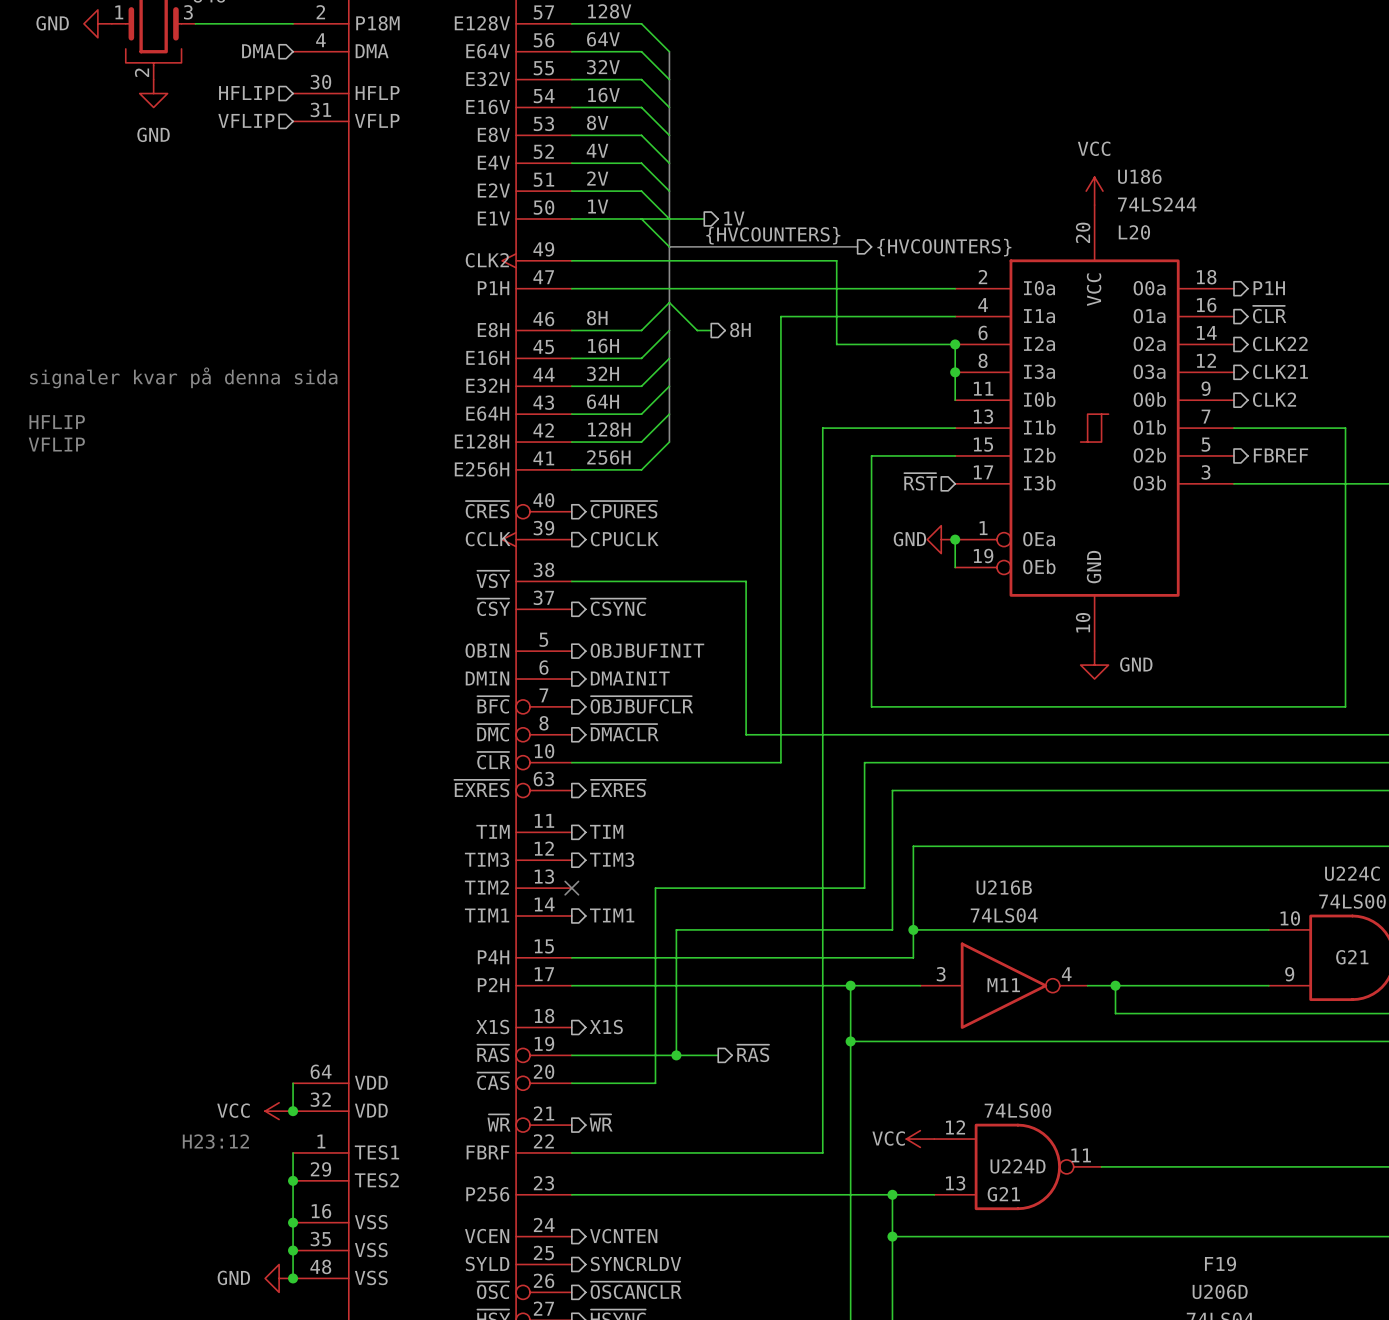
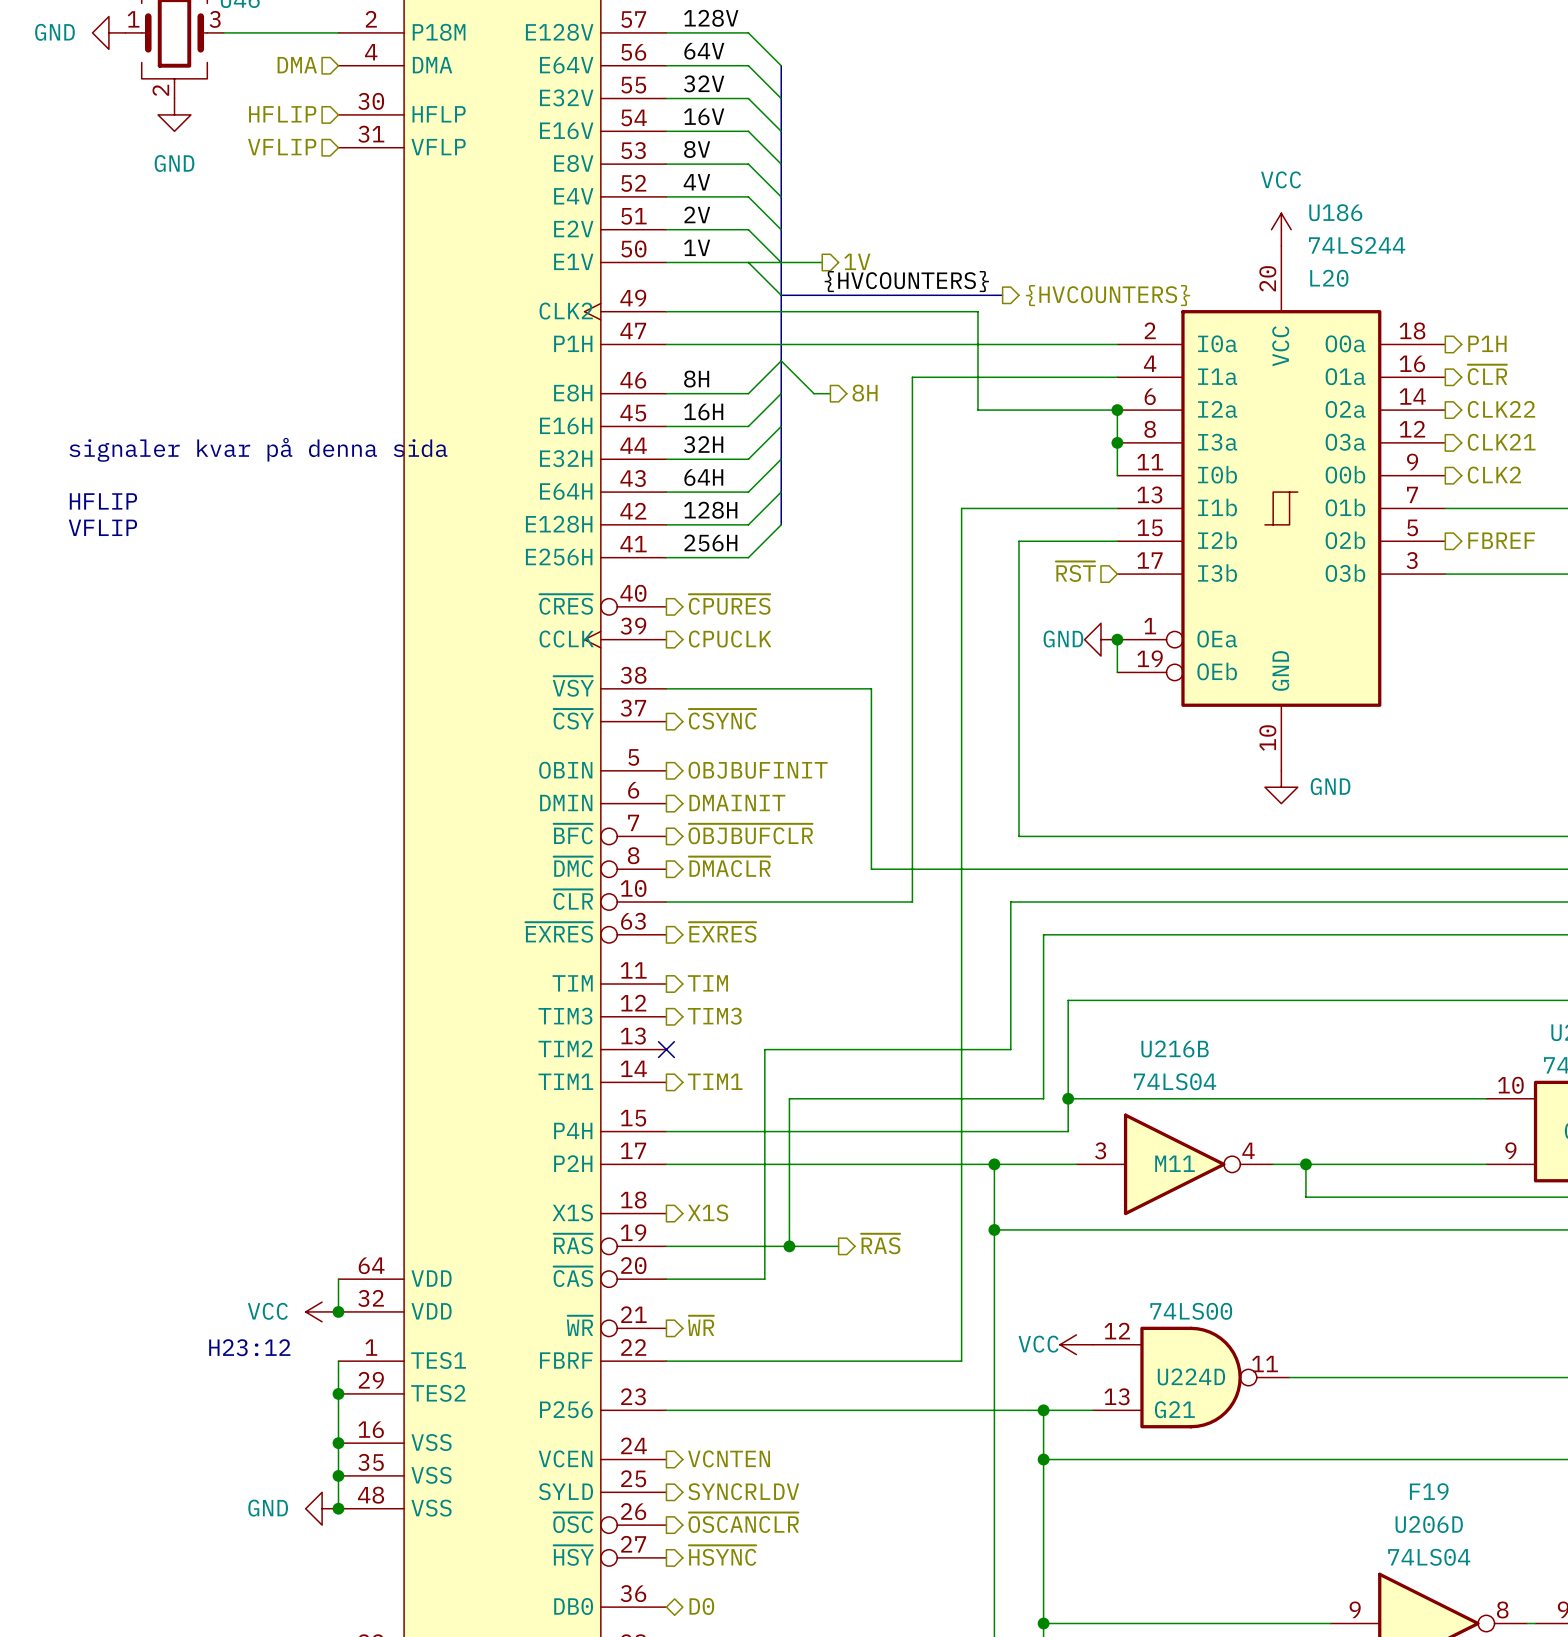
text position: signaler kvar på denna sida (183, 377) -> signaler kvar på denna sida (258, 449)
text position: HFLIP (57, 422) -> HFLIP (103, 501)
text position: VFLIP (56, 444) -> VFLIP (102, 527)

